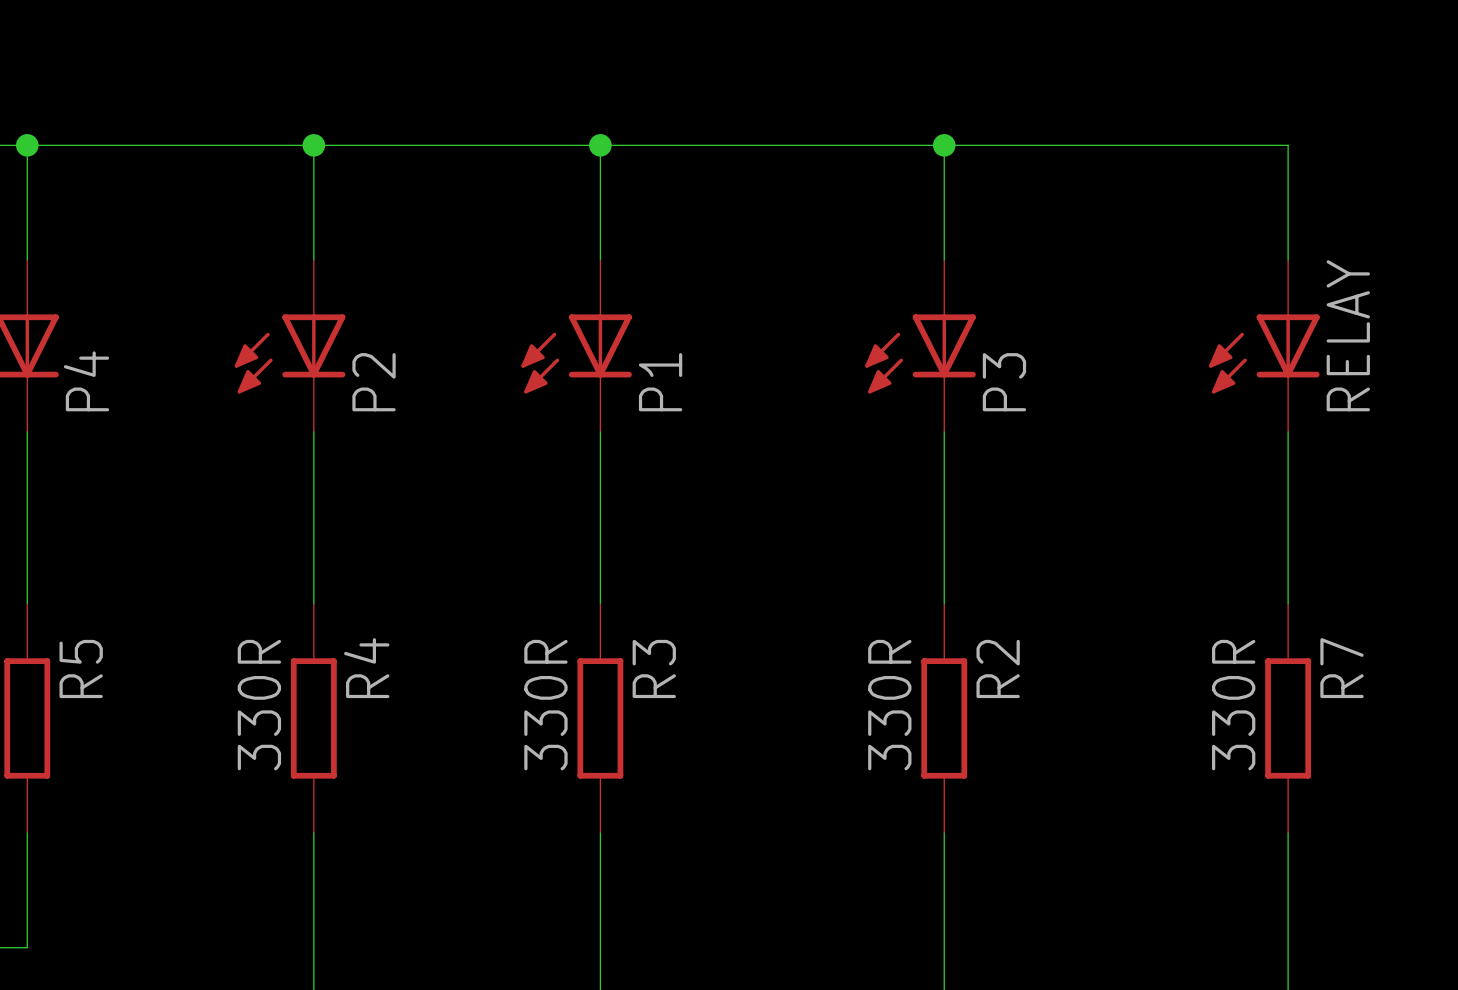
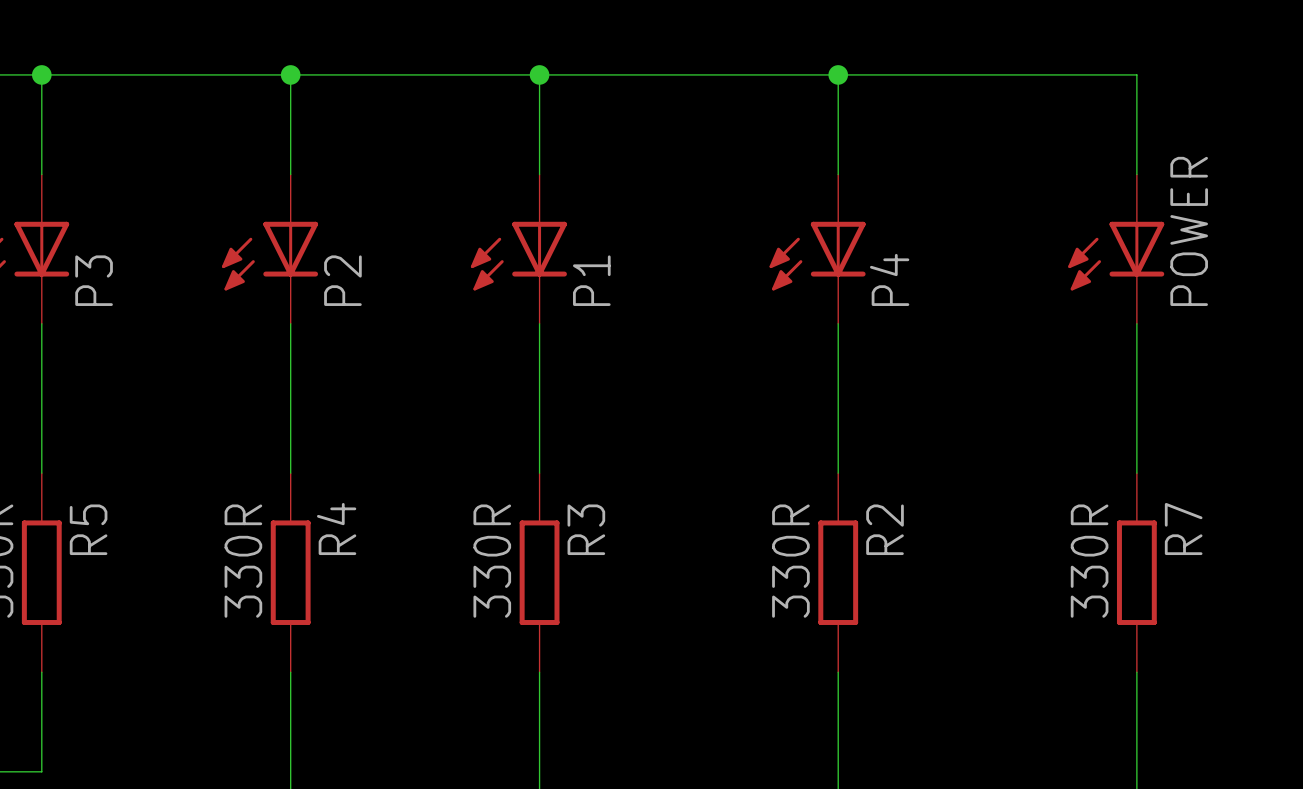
RELAY name: RELAY (1348, 335) -> POWER (1189, 231)
P4 name: P4 (86, 381) -> P3 (94, 280)
P3 name: P3 (1004, 382) -> P4 (889, 279)

